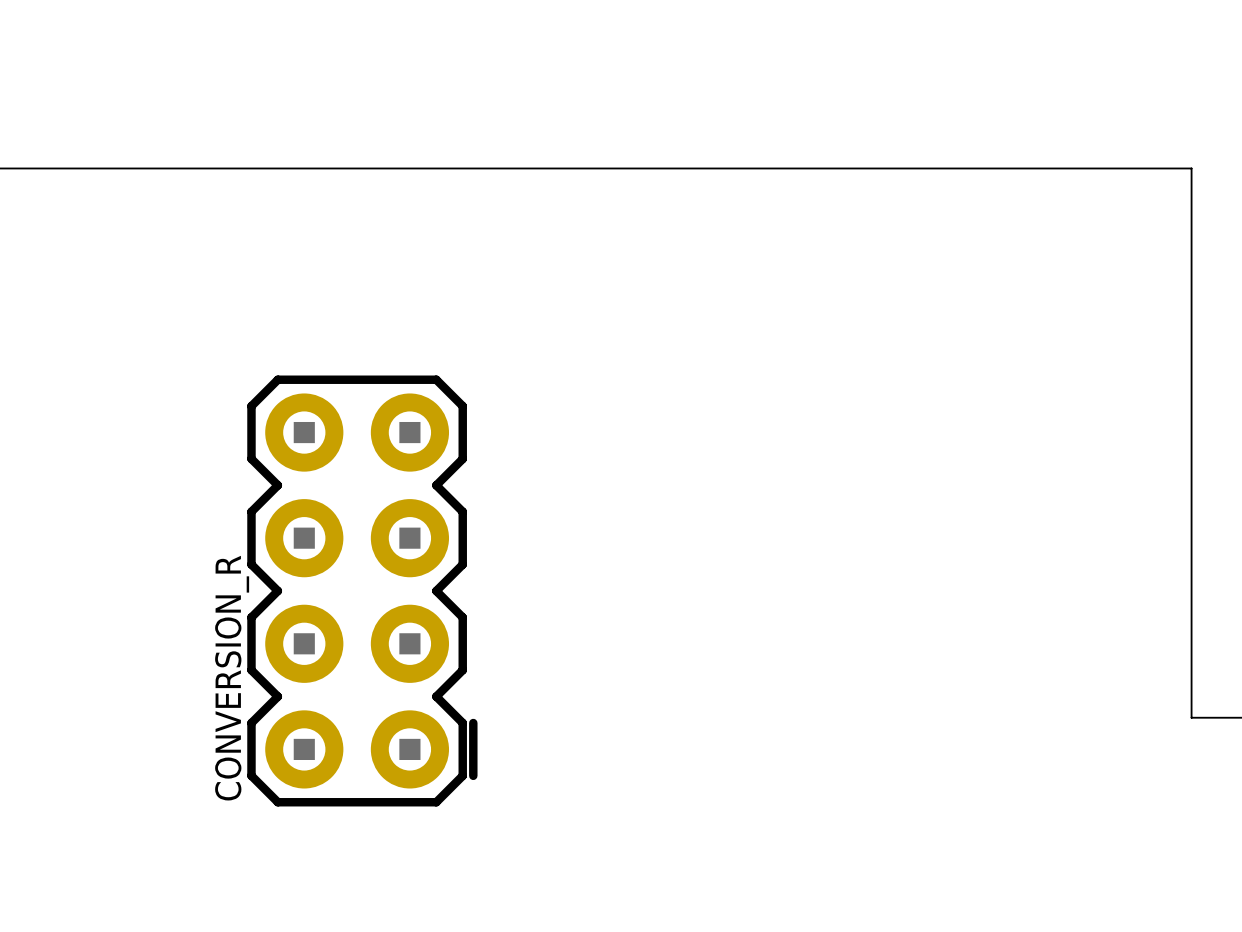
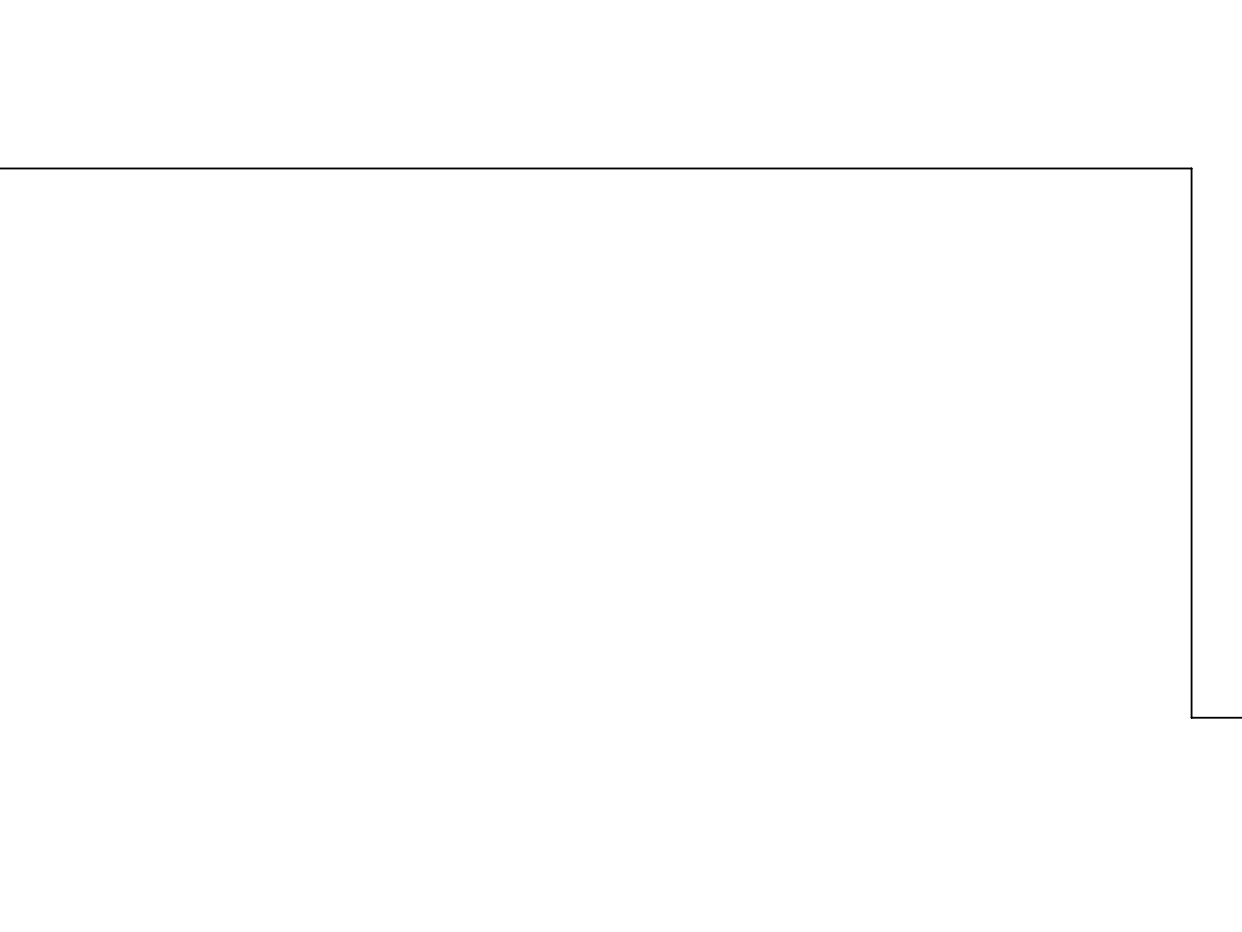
CONVERSION_R: (362, 590) -> none

